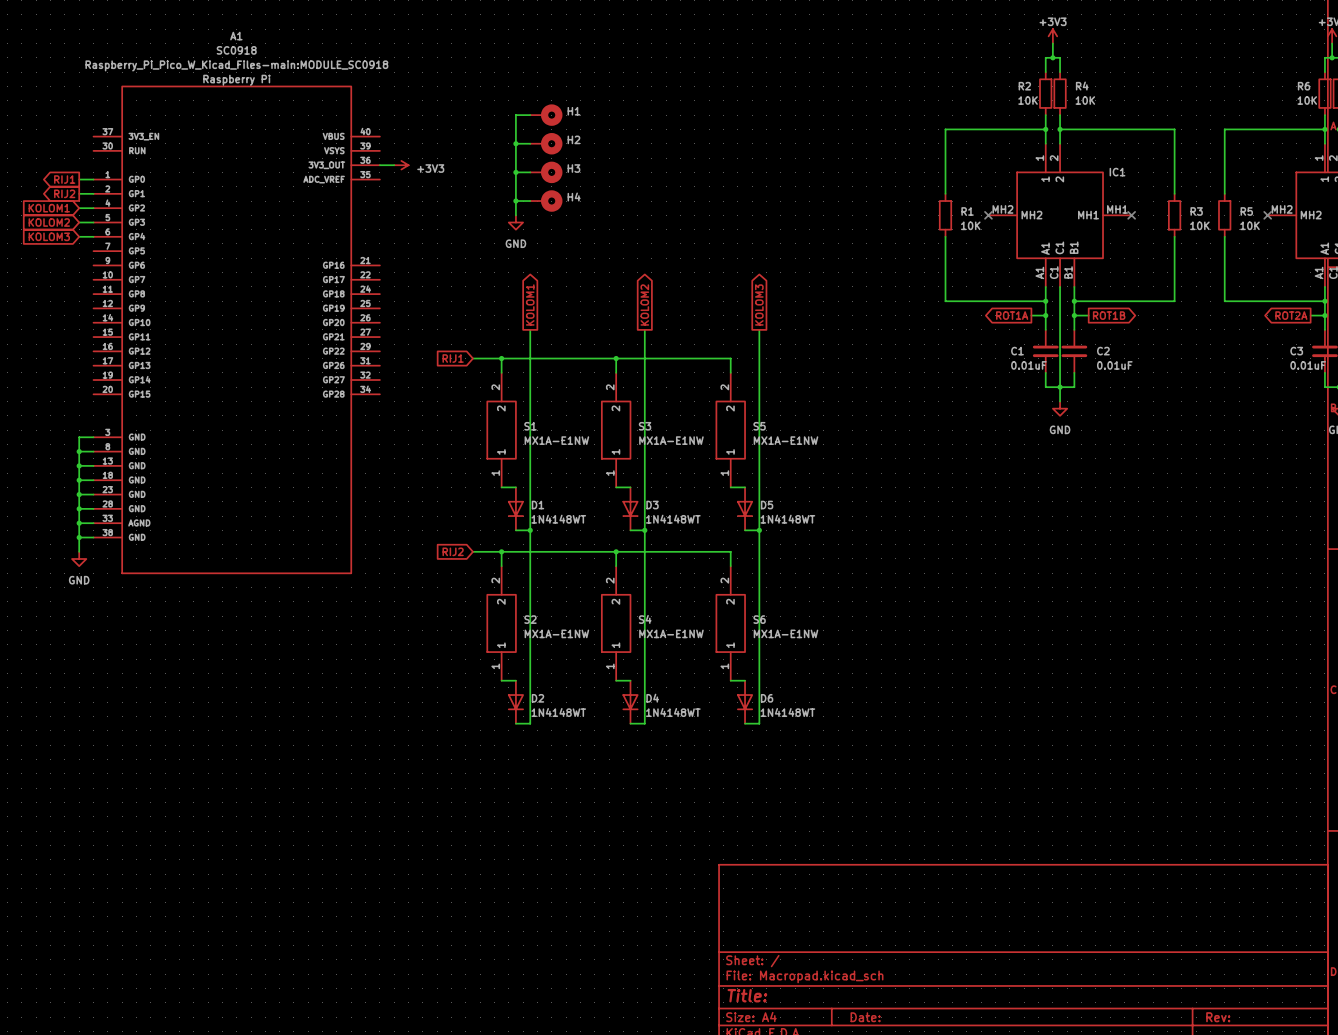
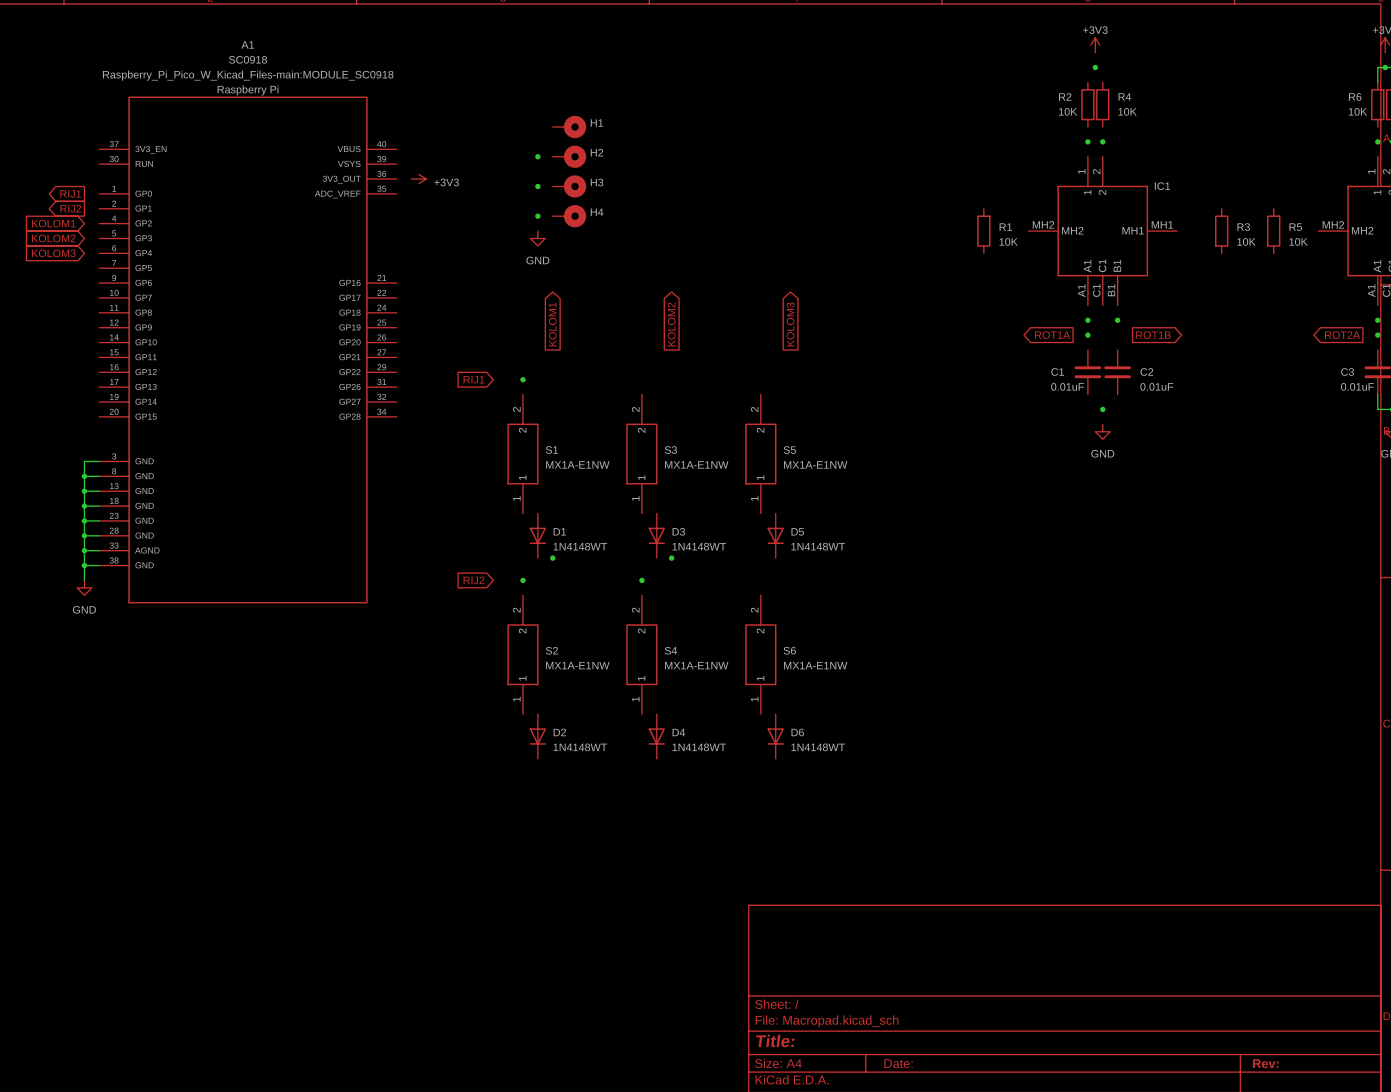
wire: (1052, 43) (1052, 57) -> none
wire: (1332, 43) (1332, 57) -> none
wire: (1045, 72) (1045, 57) (1060, 57) (1060, 72) -> none
wire: (530, 115) (515, 115) (515, 215) -> none
wire: (1045, 115) (1045, 143) -> none
wire: (1060, 115) (1060, 143) -> none
wire: (1324, 115) (1324, 143) -> none
wire: (1045, 129) (945, 129) (945, 193) -> none
wire: (1060, 129) (1174, 129) (1174, 193) -> none
wire: (1324, 129) (1224, 129) (1224, 193) -> none
wire: (515, 143) (530, 143) -> none
wire: (379, 165) (394, 165) -> none
wire: (515, 172) (530, 172) -> none
wire: (79, 179) (93, 179) -> none
wire: (79, 193) (93, 193) -> none
wire: (515, 201) (530, 201) -> none
wire: (79, 208) (93, 208) -> none
no-connect mark: (988, 215) -> none
no-connect mark: (1131, 215) -> none
no-connect mark: (1267, 215) -> none
wire: (79, 222) (93, 222) -> none
wire: (79, 236) (93, 236) -> none
wire: (945, 236) (945, 301) (1045, 301) -> none
wire: (1174, 236) (1174, 301) (1074, 301) -> none
wire: (1224, 236) (1224, 301) (1324, 301) -> none
wire: (1045, 286) (1045, 329) -> none
wire: (1060, 286) (1060, 401) -> none
wire: (1074, 286) (1074, 329) -> none
wire: (1324, 286) (1324, 329) -> none
wire: (1031, 315) (1045, 315) -> none
wire: (1074, 315) (1088, 315) -> none
junction: (1074, 315) -> none
wire: (1310, 315) (1324, 315) -> none
wire: (530, 329) (530, 723) (515, 723) -> none
wire: (644, 329) (644, 723) (630, 723) -> none
wire: (759, 329) (759, 723) (745, 723) -> none
wire: (472, 358) (730, 358) (730, 372) -> none
wire: (501, 358) (501, 372) -> none
wire: (616, 358) (616, 372) -> none
junction: (616, 358) -> none
wire: (1045, 372) (1045, 387) (1074, 387) (1074, 372) -> none
wire: (501, 487) (515, 487) -> none
wire: (616, 487) (630, 487) -> none
wire: (730, 487) (745, 487) -> none
wire: (515, 530) (530, 530) -> none
wire: (630, 530) (644, 530) -> none
wire: (745, 530) (759, 530) -> none
junction: (759, 530) -> none
wire: (472, 551) (730, 551) (730, 566) -> none
wire: (501, 551) (501, 566) -> none
wire: (616, 551) (616, 566) -> none
wire: (501, 680) (515, 680) -> none
wire: (616, 680) (630, 680) -> none
wire: (730, 680) (745, 680) -> none

